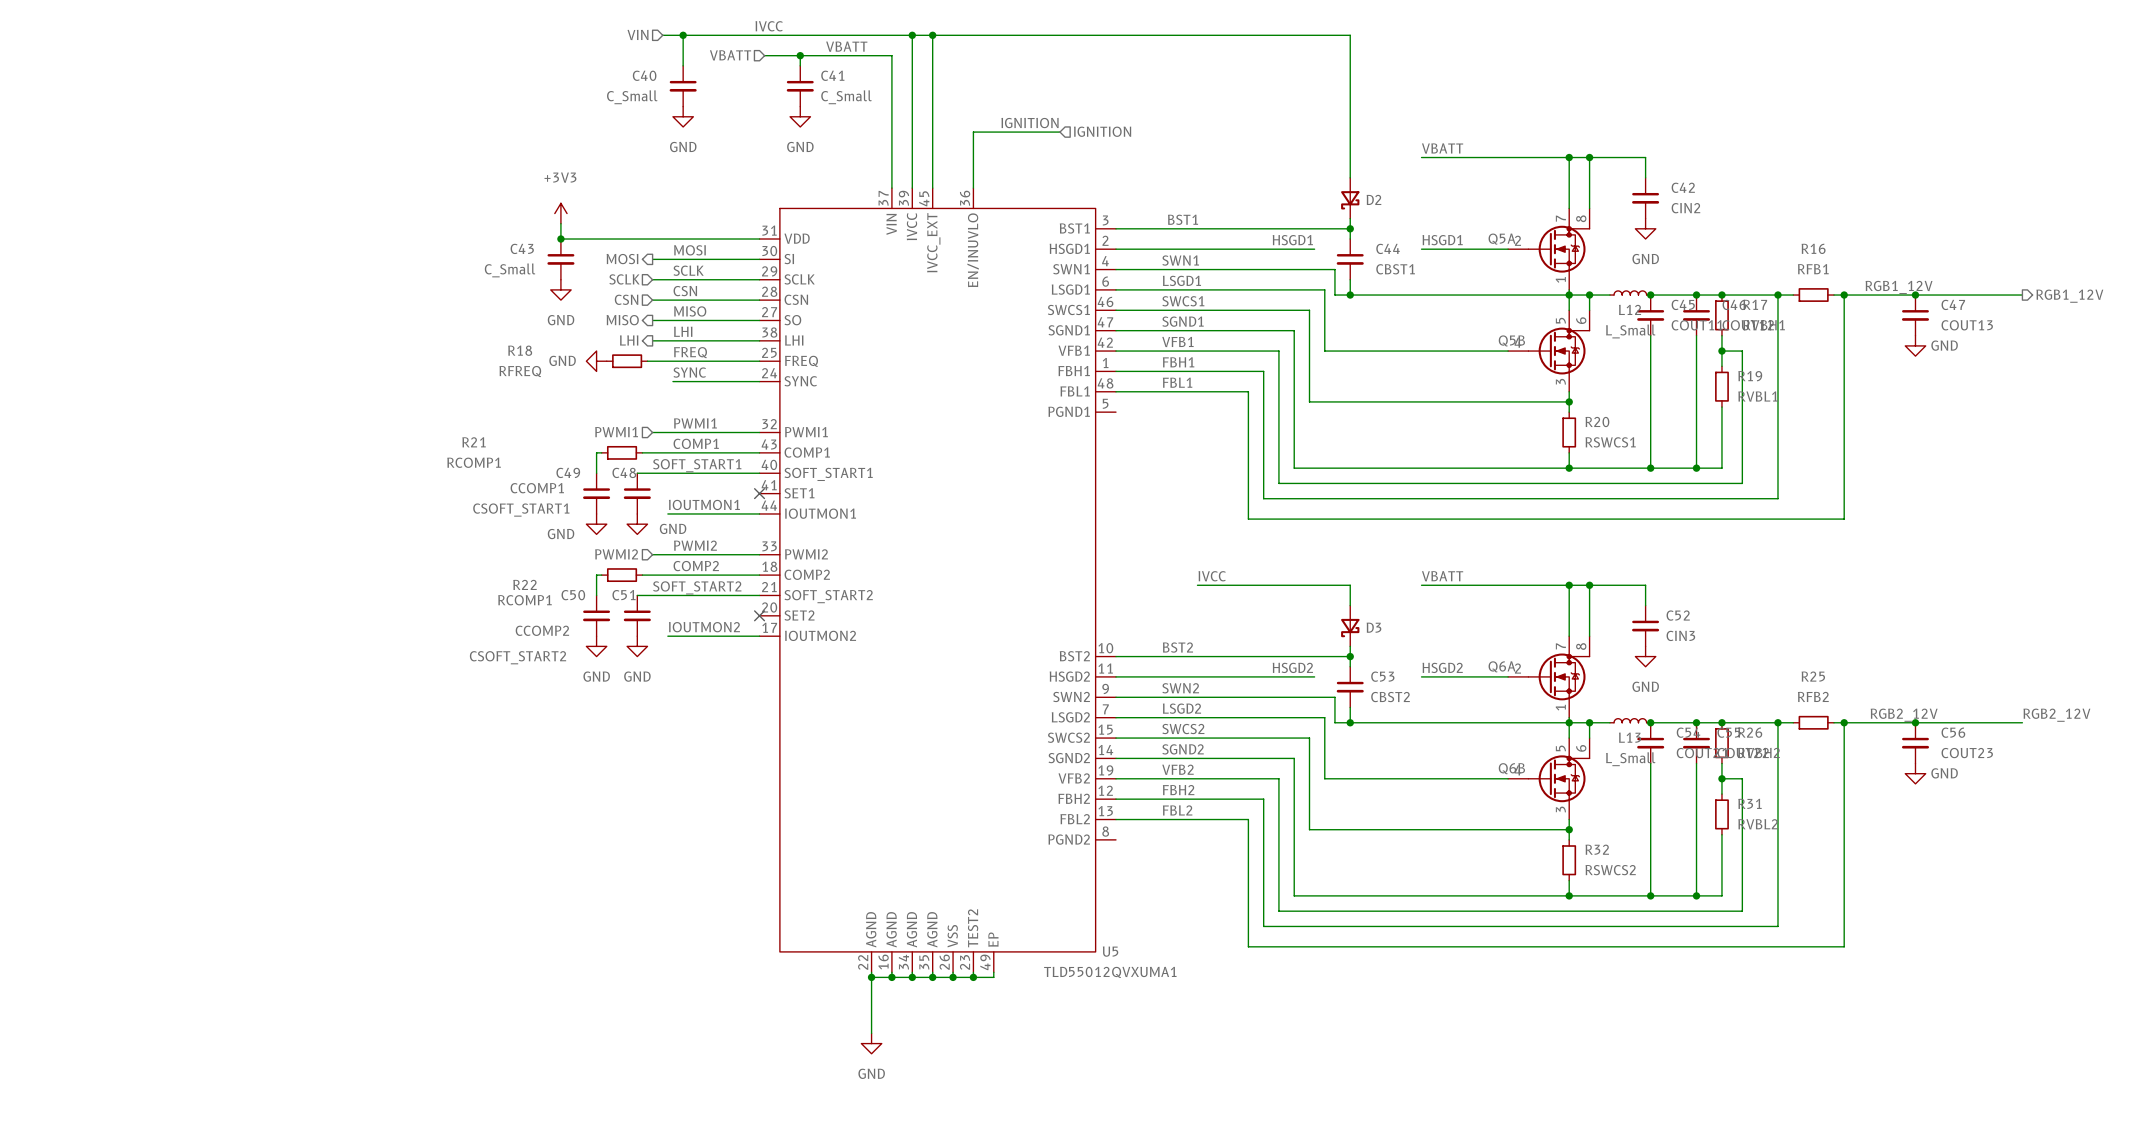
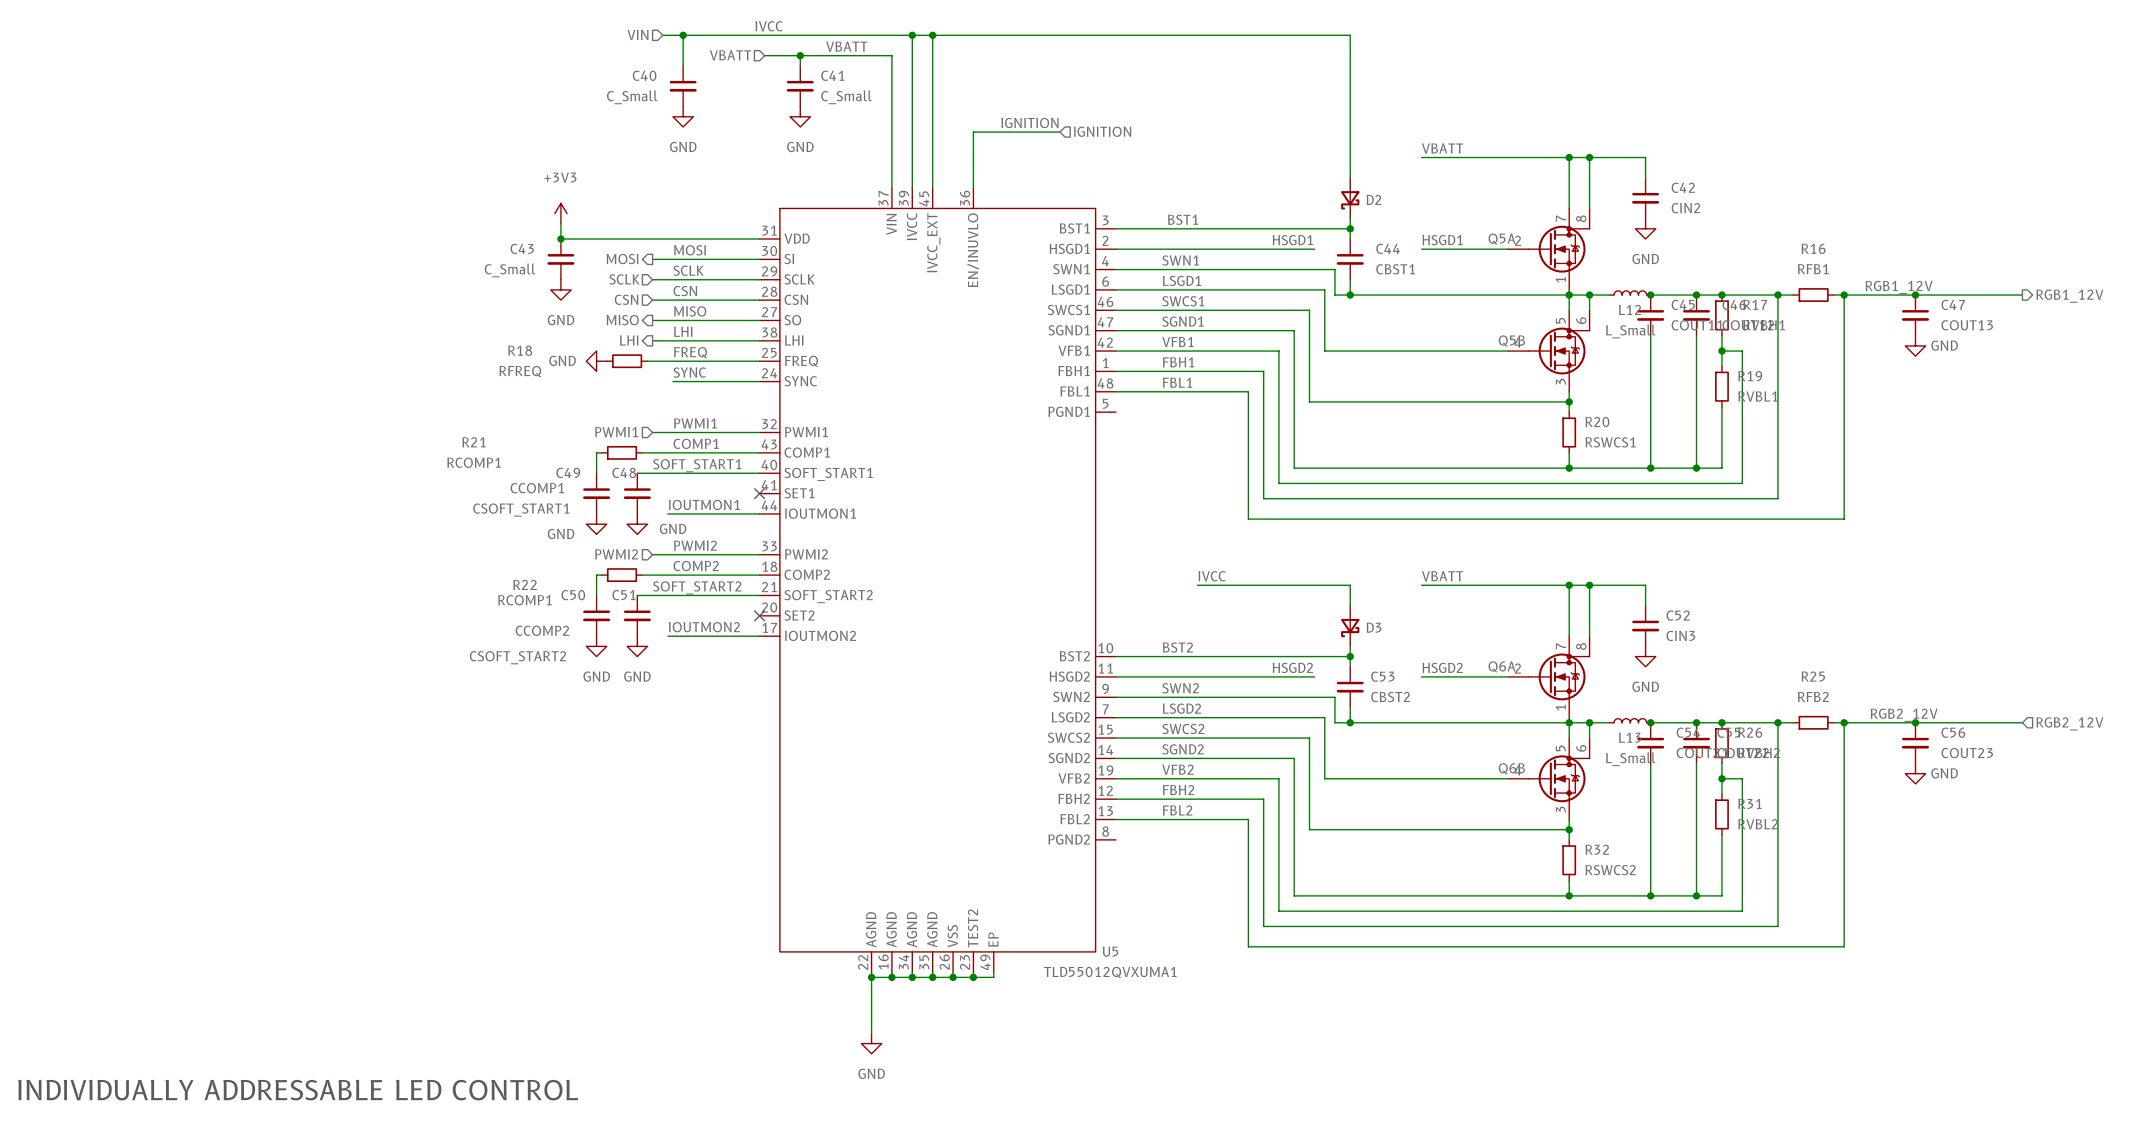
label: RGB2_12V (2056, 715) -> none
hierarchical label: none -> RGB2_12V (2069, 723)
text: none -> INDIVIDUALLY ADDRESSABLE LED CONTROL (298, 1090)

